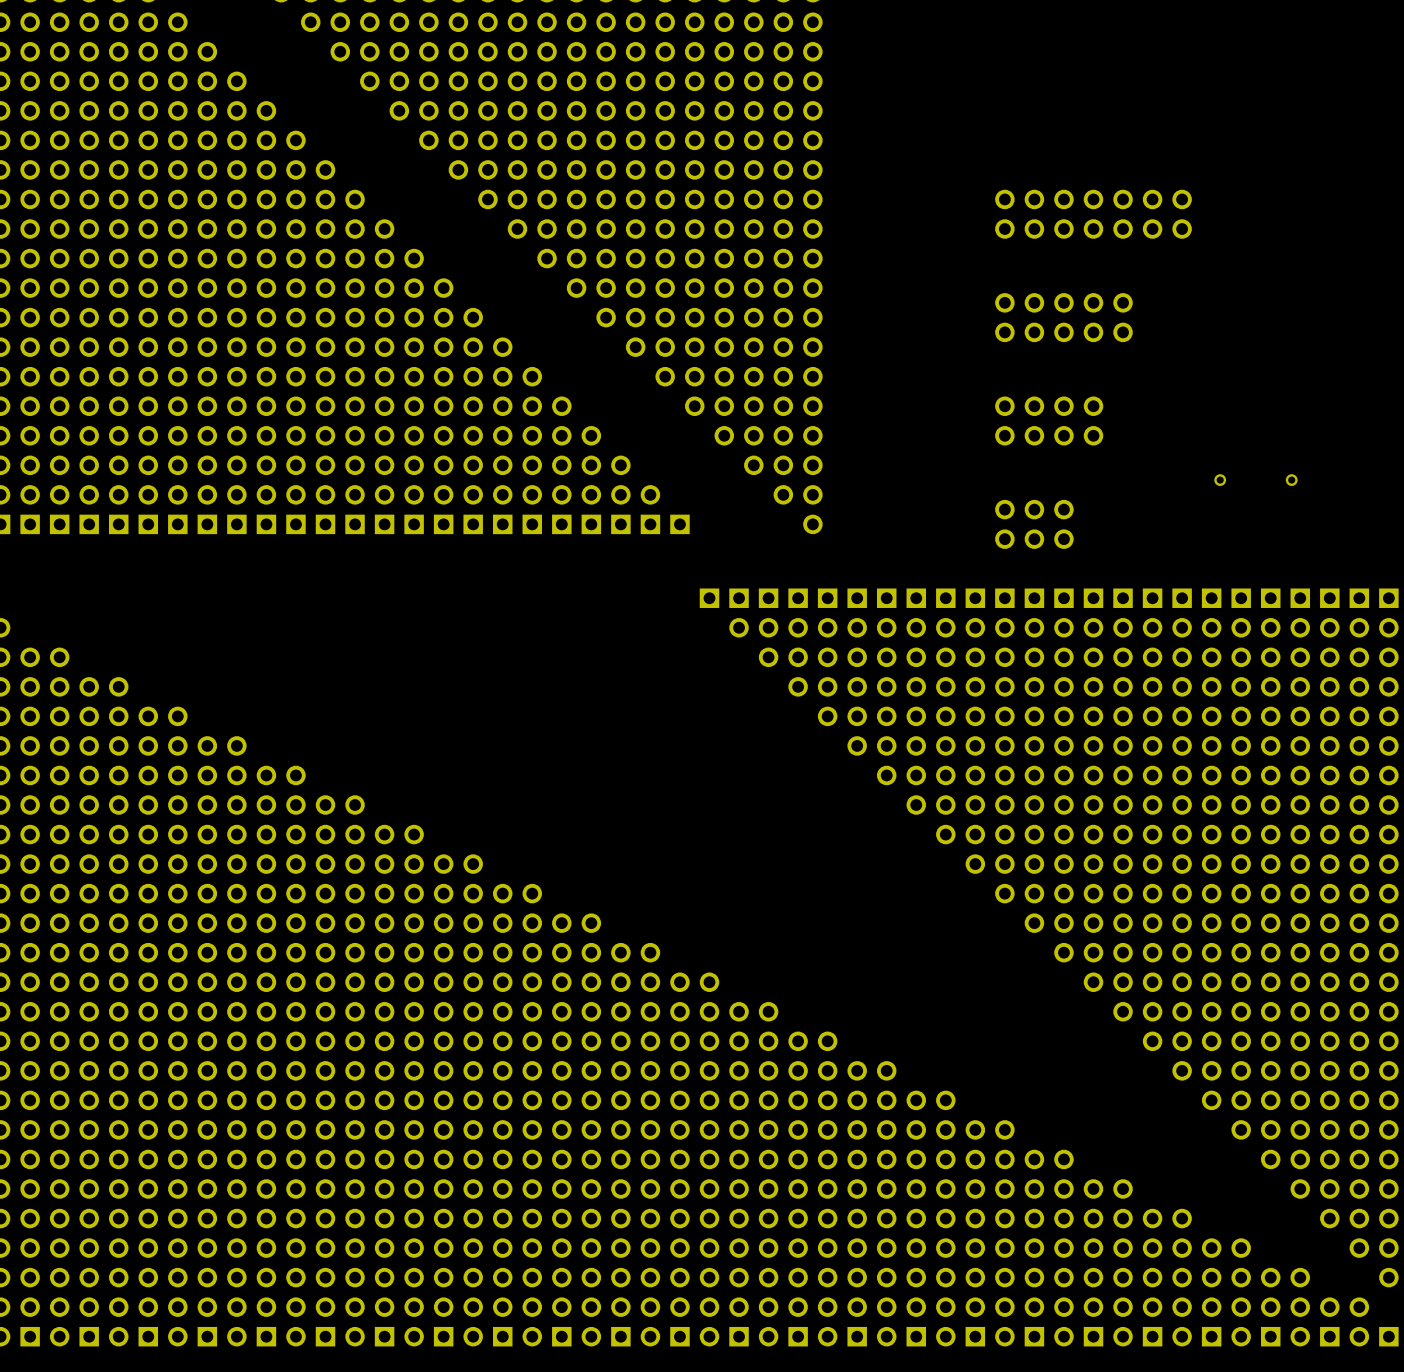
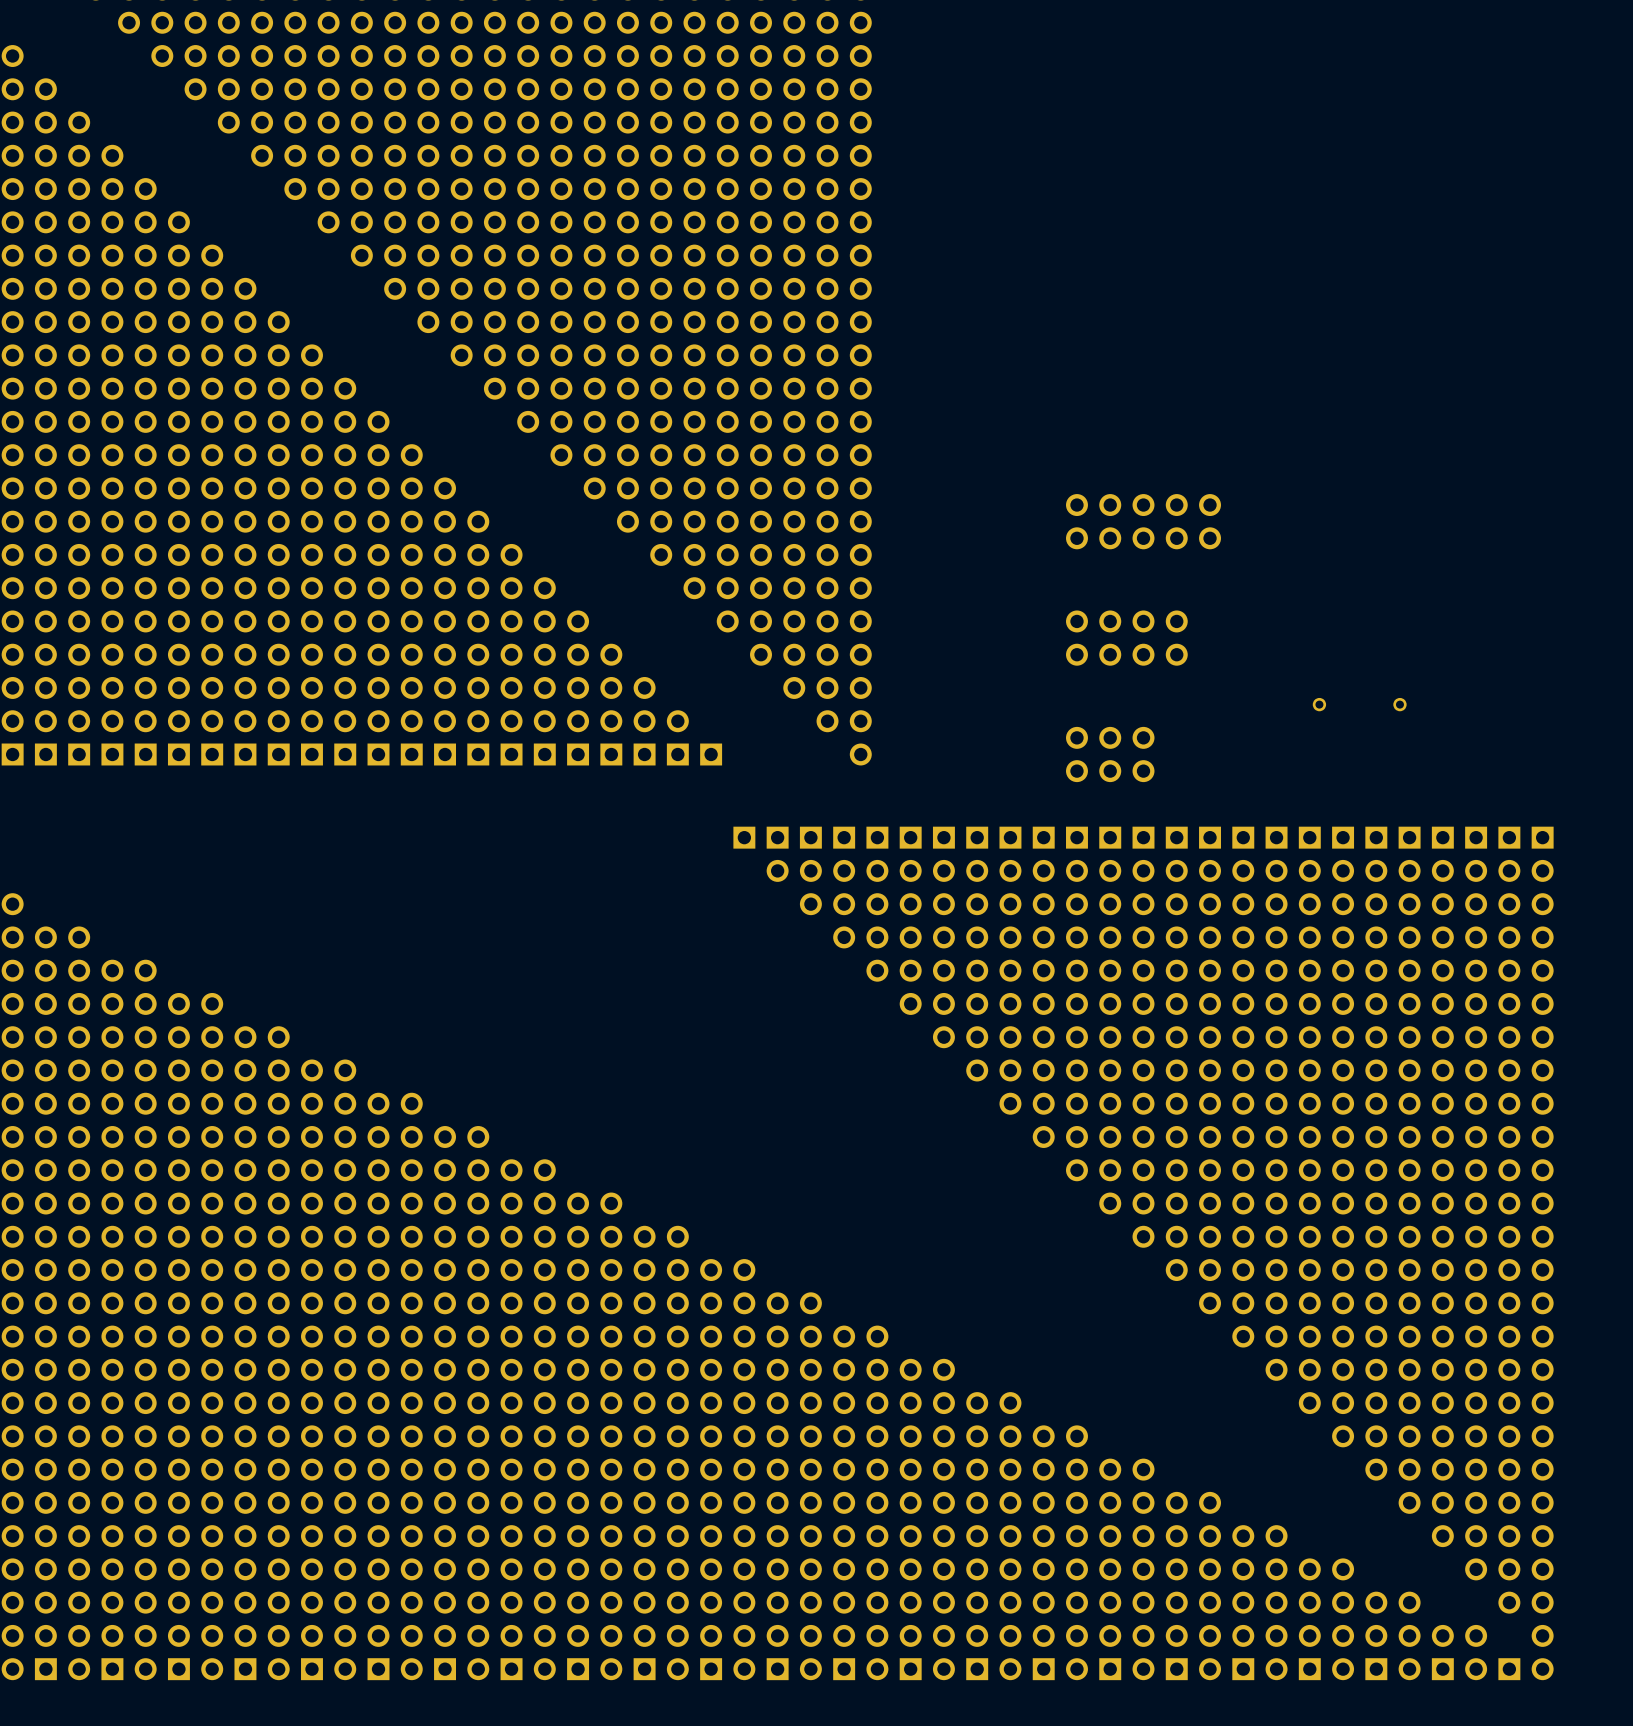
part: (1093, 214) -> none

